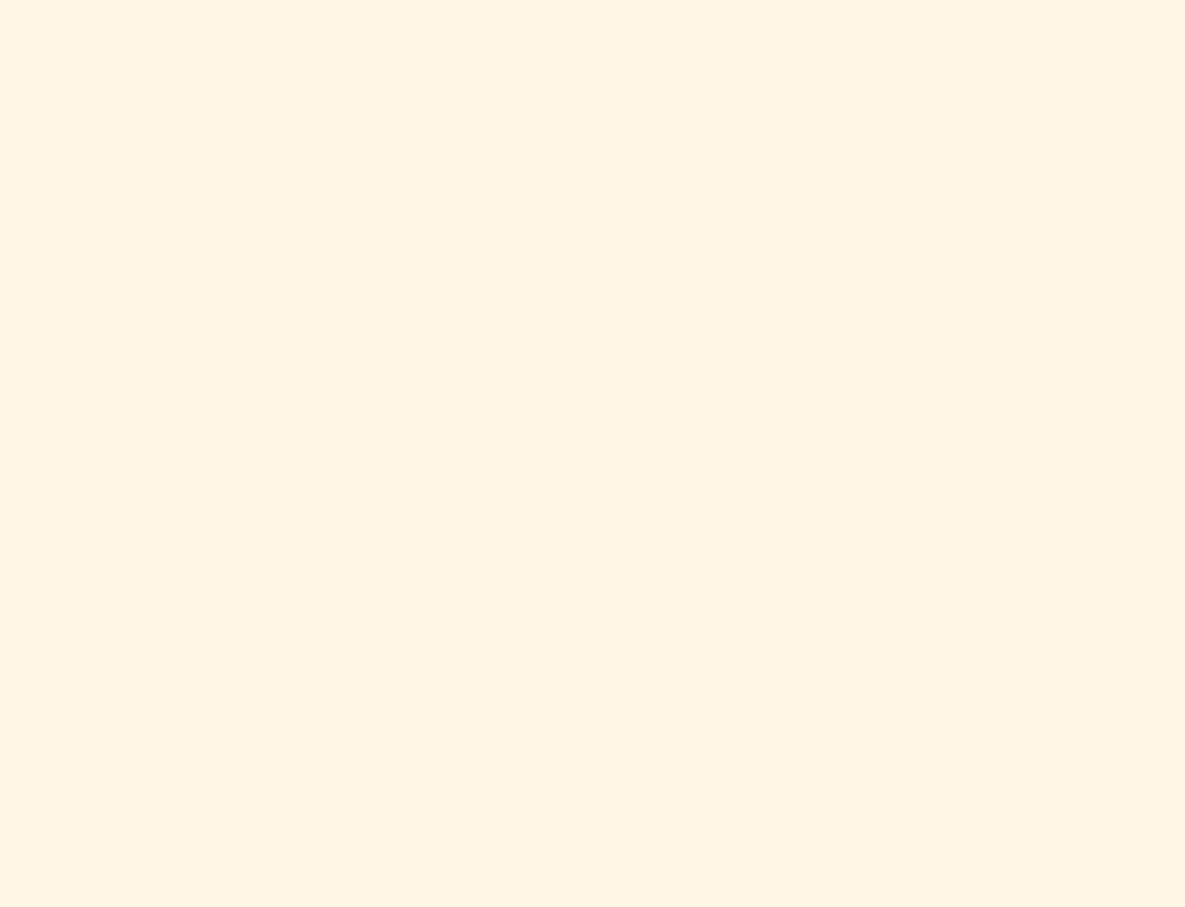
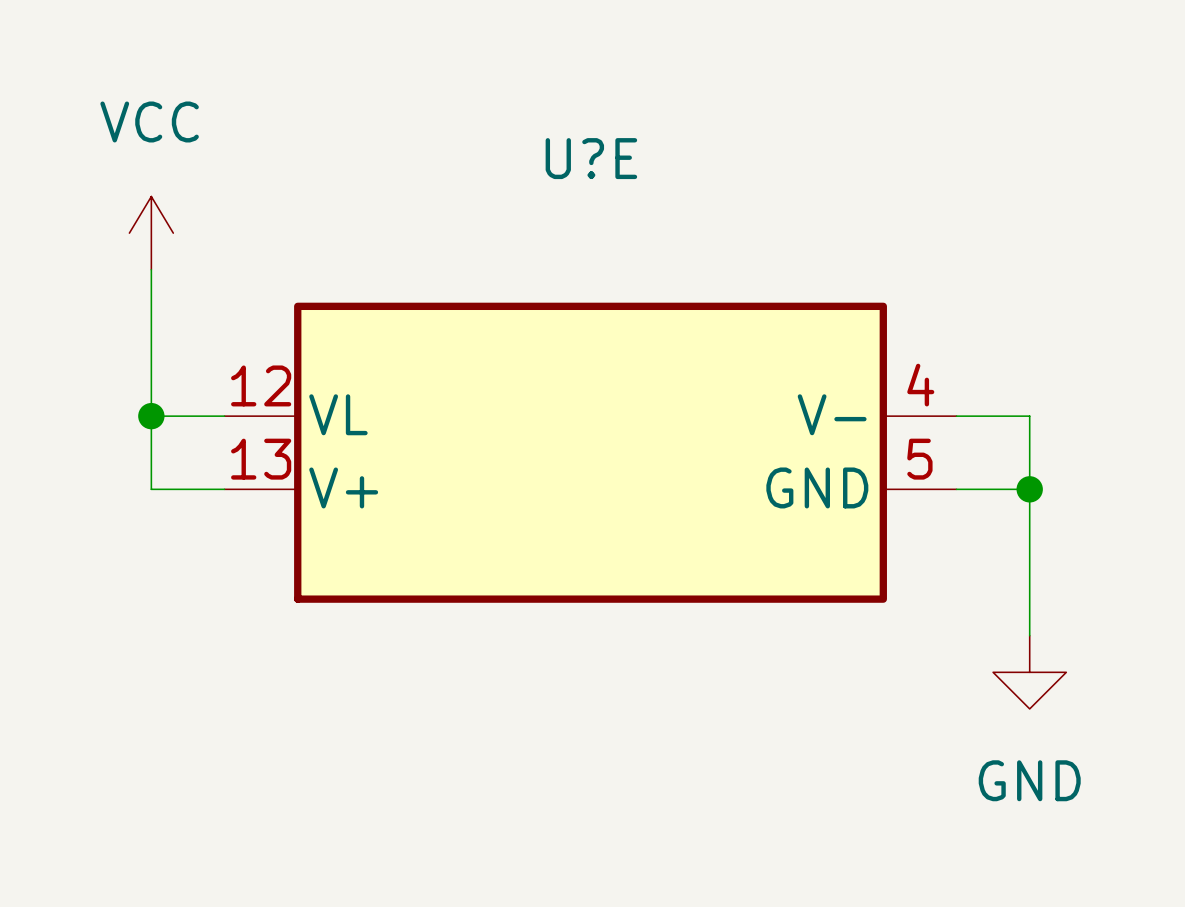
power symbol: none -> VCC (151, 233)
wire: none -> (151, 269) (151, 489) (224, 489)
wire: none -> (151, 416) (224, 416)
junction: none -> (151, 416)
wire: none -> (956, 416) (1029, 416) (1029, 635)
U?E: none -> (590, 452)
wire: none -> (956, 489) (1029, 489)
junction: none -> (1029, 489)
power symbol: none -> GND (1029, 672)

